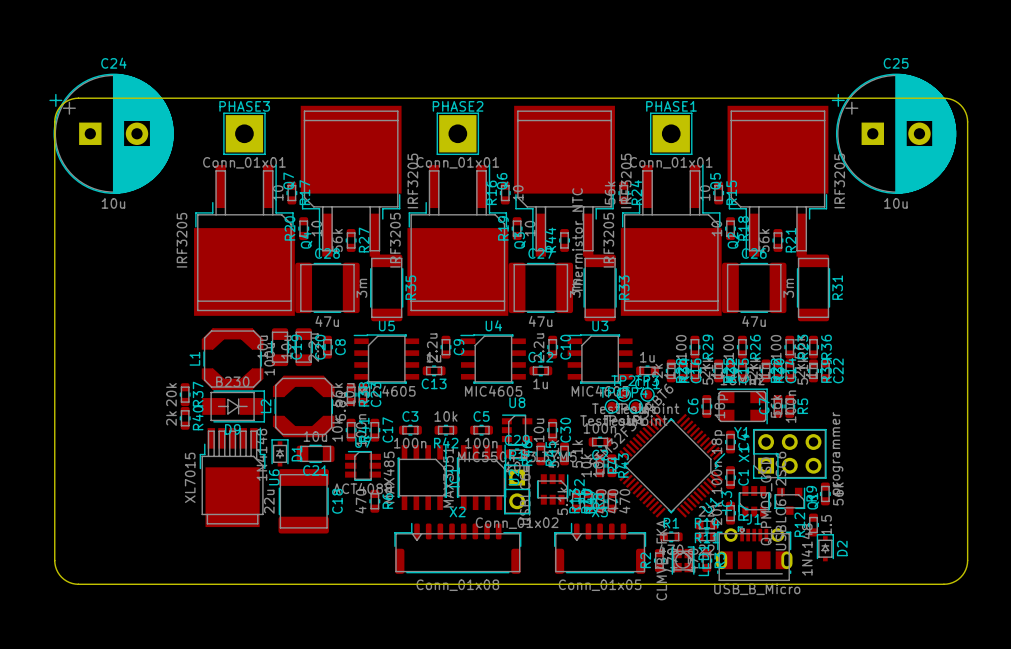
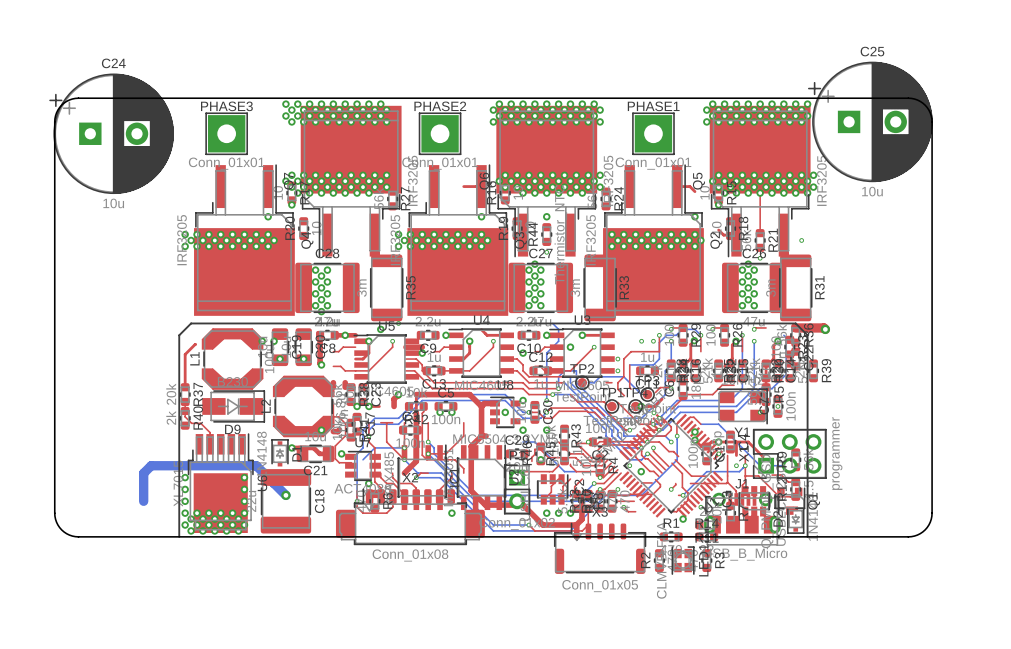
board edge: (908, 98) (952, 100) (962, 107) (967, 118) (967, 560) (962, 575) (952, 582) (943, 584) (75, 584) (64, 579) (55, 566) (54, 513) -> (908, 98) (917, 100) (925, 105) (930, 112) (932, 121) (932, 513) (928, 525) (917, 535) (908, 536) (78, 536) (69, 535) (61, 529) (56, 522) (54, 513)
via: none -> (285, 104)
via: none -> (297, 104)
via: none -> (309, 104)
via: none -> (321, 104)
via: none -> (333, 104)
via: none -> (345, 104)
via: none -> (357, 104)
via: none -> (368, 104)
via: none -> (380, 104)
via: none -> (499, 104)
via: none -> (511, 104)
via: none -> (523, 104)
via: none -> (534, 104)
via: none -> (546, 104)
via: none -> (558, 104)
via: none -> (570, 104)
via: none -> (582, 104)
via: none -> (594, 104)
via: none -> (712, 104)
via: none -> (724, 104)
via: none -> (736, 104)
via: none -> (748, 104)
via: none -> (760, 104)
via: none -> (772, 104)
via: none -> (783, 104)
via: none -> (795, 104)
via: none -> (807, 104)
via: none -> (291, 110)
via: none -> (303, 110)
via: none -> (315, 110)
via: none -> (327, 110)
via: none -> (339, 110)
via: none -> (351, 110)
via: none -> (363, 110)
via: none -> (374, 110)
via: none -> (386, 110)
via: none -> (493, 110)
via: none -> (505, 110)
via: none -> (517, 110)
via: none -> (528, 110)
via: none -> (540, 110)
via: none -> (552, 110)
via: none -> (564, 110)
via: none -> (576, 110)
via: none -> (588, 110)
via: none -> (600, 110)
via: none -> (706, 110)
via: none -> (718, 110)
via: none -> (730, 110)
via: none -> (742, 110)
via: none -> (754, 110)
via: none -> (766, 110)
via: none -> (777, 110)
via: none -> (789, 110)
via: none -> (801, 110)
via: none -> (285, 115)
via: none -> (297, 115)
via: none -> (309, 115)
via: none -> (321, 115)
via: none -> (333, 115)
via: none -> (345, 115)
via: none -> (357, 115)
via: none -> (368, 115)
via: none -> (380, 115)
via: none -> (499, 115)
via: none -> (511, 115)
via: none -> (523, 115)
via: none -> (534, 115)
via: none -> (546, 115)
via: none -> (558, 115)
via: none -> (570, 115)
via: none -> (582, 115)
via: none -> (594, 115)
via: none -> (712, 115)
via: none -> (724, 115)
via: none -> (736, 115)
via: none -> (748, 115)
via: none -> (760, 115)
via: none -> (772, 115)
via: none -> (783, 115)
via: none -> (795, 115)
via: none -> (807, 115)
via: none -> (291, 121)
via: none -> (303, 121)
via: none -> (315, 121)
via: none -> (327, 121)
via: none -> (339, 121)
via: none -> (351, 121)
via: none -> (363, 121)
via: none -> (374, 121)
via: none -> (386, 121)
via: none -> (493, 121)
via: none -> (505, 121)
via: none -> (517, 121)
via: none -> (528, 121)
via: none -> (540, 121)
via: none -> (552, 121)
via: none -> (564, 121)
via: none -> (576, 121)
via: none -> (588, 121)
via: none -> (600, 121)
via: none -> (706, 121)
via: none -> (718, 121)
via: none -> (730, 121)
via: none -> (742, 121)
via: none -> (754, 121)
via: none -> (766, 121)
via: none -> (777, 121)
via: none -> (789, 121)
via: none -> (801, 121)
PHASE3 position: (244, 133) -> (226, 133)
PHASE2 position: (457, 133) -> (440, 133)
PHASE1 position: (671, 133) -> (653, 133)
C25 position: (894, 133) -> (870, 121)
via: none -> (291, 175)
via: none -> (303, 175)
via: none -> (315, 175)
via: none -> (327, 175)
via: none -> (339, 175)
via: none -> (351, 175)
via: none -> (363, 175)
via: none -> (374, 175)
via: none -> (386, 175)
via: none -> (505, 175)
via: none -> (517, 175)
via: none -> (528, 175)
via: none -> (540, 175)
via: none -> (552, 175)
via: none -> (564, 175)
via: none -> (576, 175)
via: none -> (588, 175)
via: none -> (600, 175)
via: none -> (718, 175)
via: none -> (730, 175)
via: none -> (742, 175)
via: none -> (754, 175)
via: none -> (766, 175)
via: none -> (777, 175)
via: none -> (789, 175)
via: none -> (801, 175)
via: none -> (813, 175)
via: none -> (285, 181)
via: none -> (297, 181)
via: none -> (309, 181)
via: none -> (321, 181)
via: none -> (333, 181)
via: none -> (345, 181)
via: none -> (357, 181)
via: none -> (368, 181)
via: none -> (380, 181)
via: none -> (499, 181)
via: none -> (511, 181)
via: none -> (523, 181)
via: none -> (534, 181)
via: none -> (546, 181)
via: none -> (558, 181)
Q6 position: (564, 181) -> (546, 181)
via: none -> (570, 181)
via: none -> (582, 181)
via: none -> (594, 181)
via: none -> (712, 181)
via: none -> (724, 181)
via: none -> (736, 181)
via: none -> (748, 181)
via: none -> (760, 181)
via: none -> (772, 181)
Q5 position: (777, 181) -> (760, 181)
via: none -> (783, 181)
via: none -> (795, 181)
via: none -> (807, 181)
top track: none -> (463, 186) (476, 186) (481, 191)
top track: none -> (677, 186) (689, 186) (694, 191)
via: none -> (291, 187)
via: none -> (303, 187)
via: none -> (315, 187)
via: none -> (327, 187)
via: none -> (339, 187)
via: none -> (351, 187)
via: none -> (363, 187)
via: none -> (374, 187)
via: none -> (386, 187)
via: none -> (505, 187)
via: none -> (517, 187)
via: none -> (528, 187)
via: none -> (540, 187)
via: none -> (552, 187)
via: none -> (564, 187)
via: none -> (576, 187)
via: none -> (588, 187)
via: none -> (600, 187)
via: none -> (718, 187)
via: none -> (730, 187)
via: none -> (742, 187)
via: none -> (754, 187)
via: none -> (766, 187)
via: none -> (777, 187)
via: none -> (789, 187)
via: none -> (801, 187)
via: none -> (813, 187)
via: none -> (297, 193)
via: none -> (309, 193)
via: none -> (321, 193)
via: none -> (333, 193)
via: none -> (345, 193)
via: none -> (357, 193)
via: none -> (368, 193)
via: none -> (523, 193)
via: none -> (534, 193)
via: none -> (546, 193)
via: none -> (558, 193)
via: none -> (570, 193)
via: none -> (582, 193)
R24 position: (623, 193) -> (606, 198)
via: none -> (724, 193)
via: none -> (736, 193)
via: none -> (748, 193)
top track: none -> (760, 193) (760, 233)
via: none -> (760, 193)
via: none -> (772, 193)
via: none -> (783, 193)
via: none -> (795, 193)
via: none -> (807, 193)
via: none -> (291, 204)
via: none -> (718, 204)
via: none -> (268, 216)
via: none -> (481, 216)
via: none -> (546, 216)
via: none -> (694, 216)
top track: none -> (718, 230) (723, 235) (736, 235)
via: none -> (185, 234)
via: none -> (197, 234)
via: none -> (208, 234)
via: none -> (220, 234)
via: none -> (232, 234)
via: none -> (244, 234)
via: none -> (256, 234)
via: none -> (268, 234)
via: none -> (398, 234)
via: none -> (410, 234)
via: none -> (422, 234)
via: none -> (434, 234)
via: none -> (445, 234)
via: none -> (457, 234)
via: none -> (469, 234)
via: none -> (481, 234)
via: none -> (611, 234)
via: none -> (623, 234)
via: none -> (635, 234)
via: none -> (647, 234)
via: none -> (659, 234)
via: none -> (671, 234)
via: none -> (683, 234)
via: none -> (694, 234)
via: none -> (191, 240)
via: none -> (202, 240)
via: none -> (214, 240)
via: none -> (226, 240)
via: none -> (238, 240)
via: none -> (250, 240)
via: none -> (262, 240)
via: none -> (274, 240)
R27 position: (351, 240) -> (392, 198)
via: none -> (404, 240)
via: none -> (416, 240)
via: none -> (428, 240)
via: none -> (440, 240)
via: none -> (451, 240)
via: none -> (463, 240)
via: none -> (475, 240)
via: none -> (487, 240)
R44 position: (564, 240) -> (546, 234)
via: none -> (617, 240)
via: none -> (629, 240)
via: none -> (641, 240)
via: none -> (653, 240)
via: none -> (665, 240)
Q2 position: (671, 240) -> (653, 240)
via: none -> (677, 240)
via: none -> (689, 240)
via: none -> (700, 240)
R21 position: (777, 240) -> (760, 240)
via: none -> (801, 240)
via: none -> (185, 246)
via: none -> (197, 246)
via: none -> (208, 246)
via: none -> (220, 246)
via: none -> (232, 246)
via: none -> (244, 246)
via: none -> (256, 246)
via: none -> (268, 246)
via: none -> (398, 246)
via: none -> (410, 246)
via: none -> (422, 246)
via: none -> (434, 246)
via: none -> (445, 246)
via: none -> (457, 246)
via: none -> (469, 246)
via: none -> (481, 246)
via: none -> (611, 246)
via: none -> (623, 246)
via: none -> (635, 246)
via: none -> (647, 246)
via: none -> (659, 246)
via: none -> (671, 246)
via: none -> (683, 246)
via: none -> (694, 246)
via: none -> (546, 252)
via: none -> (760, 258)
via: none -> (534, 264)
via: none -> (748, 264)
via: none -> (315, 270)
via: none -> (327, 270)
via: none -> (528, 270)
via: none -> (540, 270)
via: none -> (742, 270)
via: none -> (754, 270)
via: none -> (321, 276)
via: none -> (534, 276)
via: none -> (748, 276)
via: none -> (315, 281)
via: none -> (327, 281)
via: none -> (528, 281)
via: none -> (540, 281)
via: none -> (742, 281)
via: none -> (754, 281)
via: none -> (321, 287)
via: none -> (534, 287)
via: none -> (748, 287)
R31 position: (813, 287) -> (795, 287)
via: none -> (315, 293)
via: none -> (327, 293)
via: none -> (528, 293)
via: none -> (540, 293)
via: none -> (742, 293)
via: none -> (754, 293)
via: none -> (321, 299)
via: none -> (534, 299)
via: none -> (748, 299)
via: none -> (315, 305)
via: none -> (327, 305)
via: none -> (528, 305)
via: none -> (540, 305)
via: none -> (742, 305)
via: none -> (754, 305)
via: none -> (321, 311)
via: none -> (398, 323)
bottom track: none -> (552, 323) (558, 329) (558, 341) (546, 353) (546, 400)
top track: none -> (683, 327) (671, 329)
top track: none -> (724, 327) (712, 329)
top track: none -> (766, 327) (754, 329)
top track: none -> (795, 327) (825, 329)
via: none -> (380, 329)
top track: none -> (481, 329) (487, 335) (506, 335)
via: none -> (671, 329)
via: none -> (712, 329)
via: none -> (754, 329)
via: none -> (825, 329)
top track: none -> (320, 335) (321, 364)
top track: none -> (334, 335) (355, 335)
via: none -> (345, 335)
via: none -> (445, 335)
via: none -> (546, 335)
top track: none -> (582, 335) (607, 335)
via: none -> (582, 335)
top track: none -> (659, 335) (659, 351) (631, 351) (623, 359) (623, 376) (617, 382) (617, 389) (624, 395)
via: none -> (659, 335)
bottom track: none -> (700, 335) (694, 329) (682, 329) (676, 335) (666, 335) (659, 342) (659, 359) (653, 364) (629, 364)
top track: none -> (700, 335) (700, 351)
via: none -> (700, 335)
bottom track: none -> (742, 335) (742, 388) (730, 400) (677, 400) (659, 418)
top track: none -> (742, 335) (742, 351)
via: none -> (742, 335)
bottom track: none -> (783, 335) (786, 337) (786, 374) (772, 388) (760, 388) (736, 412) (680, 412) (662, 430) (659, 430)
top track: none -> (694, 340) (690, 344) (690, 358) (683, 366)
via: none -> (694, 340)
via: none -> (262, 341)
via: none -> (274, 341)
top track: none -> (368, 341) (368, 353) (363, 359) (355, 359)
via: none -> (368, 341)
top track: none -> (392, 341) (392, 347) (368, 370) (345, 370) (340, 366) (333, 366)
via: none -> (392, 341)
top track: none -> (469, 341) (469, 353) (463, 359) (456, 359)
via: none -> (469, 341)
top track: none -> (493, 341) (493, 347) (469, 370) (444, 370) (439, 366) (434, 366)
via: none -> (493, 341)
via: none -> (641, 341)
via: none -> (653, 341)
bottom track: none -> (671, 341) (671, 364) (665, 370) (665, 394) (641, 418) (623, 418)
via: none -> (671, 341)
top track: none -> (736, 341) (732, 345) (732, 358) (724, 366)
via: none -> (736, 341)
bottom track: none -> (754, 341) (754, 388) (736, 406) (678, 406) (660, 424) (653, 424)
via: none -> (754, 341)
top track: none -> (777, 341) (773, 345) (773, 358) (766, 366) (766, 387)
via: none -> (777, 341)
top track: none -> (195, 344) (185, 354) (185, 387)
C8 rotation: 0° (327, 347) -> 90° clockwise (327, 335)
top track: none -> (355, 347) (343, 347) (338, 351) (333, 351)
top track: none -> (405, 347) (422, 347)
C9 rotation: 0° (445, 347) -> 90° clockwise (428, 335)
C9 position: (445, 347) -> (428, 335)
top track: none -> (456, 347) (444, 347) (439, 351) (434, 351)
C10 rotation: 0° (552, 347) -> 90° clockwise (528, 335)
C10 position: (552, 347) -> (528, 335)
top track: none -> (557, 347) (544, 347) (540, 351) (534, 351)
via: none -> (570, 347)
top track: none -> (594, 347) (570, 370) (544, 370) (540, 366) (534, 366)
via: none -> (594, 347)
R29 position: (694, 347) -> (683, 335)
R26 position: (742, 347) -> (724, 335)
R36 position: (813, 347) -> (795, 335)
via: none -> (422, 353)
via: none -> (523, 353)
via: none -> (280, 359)
via: none -> (303, 359)
top track: none -> (405, 359) (416, 359) (422, 364) (422, 370) (434, 382) (523, 382) (528, 388) (558, 388)
U4 position: (493, 359) -> (481, 353)
top track: none -> (506, 359) (517, 359) (523, 364) (523, 370) (528, 376) (570, 376)
U3 position: (599, 359) -> (581, 353)
via: none -> (617, 359)
via: none -> (321, 364)
top track: none -> (629, 364) (631, 389)
top track: none -> (405, 370) (414, 370) (432, 388) (523, 388) (528, 394) (552, 394)
top track: none -> (506, 370) (517, 370) (528, 382) (564, 382)
via: none -> (617, 370)
C22 position: (825, 370) -> (795, 359)
bottom track: none -> (570, 376) (570, 382) (617, 430) (617, 436) (623, 442) (647, 442)
top track: none -> (333, 382) (333, 387)
top track: none -> (345, 382) (345, 387)
bottom track: none -> (564, 382) (611, 430) (611, 436) (623, 447) (641, 447)
bottom track: none -> (588, 382) (594, 382) (600, 376) (623, 376) (641, 394)
top track: none -> (606, 382) (611, 382)
top track: none -> (734, 385) (722, 385) (712, 394) (684, 394) (671, 409)
bottom track: none -> (558, 388) (558, 376) (564, 370) (576, 370) (576, 382) (623, 430) (623, 436) (665, 436) (671, 442)
via: none -> (558, 388)
top track: none -> (671, 388) (660, 387) (655, 392)
via: none -> (671, 388)
via: none -> (398, 394)
bottom track: none -> (552, 394) (570, 394) (606, 430) (606, 436) (629, 459) (641, 459) (647, 453)
via: none -> (552, 394)
top track: none -> (570, 394) (577, 401) (604, 401) (611, 409)
TP2 position: (623, 394) -> (582, 382)
top track: none -> (398, 396) (394, 399) (394, 406)
top track: none -> (662, 399) (654, 406) (641, 406)
via: none -> (523, 400)
via: none -> (546, 400)
top track: none -> (185, 401) (185, 416) (191, 423) (200, 423) (210, 432) (210, 444)
top track: none -> (333, 401) (333, 416) (338, 416) (345, 423) (345, 435) (335, 445) (335, 458) (339, 462) (351, 462)
top track: none -> (617, 402) (639, 424) (653, 424)
top track: none -> (495, 403) (484, 403) (481, 406) (481, 436)
via: none -> (357, 406)
top track: none -> (368, 406) (379, 406)
via: none -> (368, 406)
top track: none -> (423, 406) (422, 455) (426, 459) (454, 459) (463, 468) (463, 473)
top track: none -> (481, 406) (469, 394) (416, 394) (416, 461) (404, 473)
via: none -> (641, 406)
C6 position: (706, 406) -> (683, 388)
via: none -> (777, 406)
R5 position: (789, 406) -> (766, 394)
via: none -> (440, 412)
via: none -> (451, 412)
via: none -> (505, 412)
bottom track: none -> (528, 412) (523, 412) (505, 394) (422, 394) (398, 418) (374, 418) (363, 430) (363, 447) (357, 453) (357, 501)
top track: none -> (528, 412) (538, 412) (544, 418) (552, 418) (559, 411) (587, 411) (594, 412) (601, 418)
via: none -> (528, 412)
bottom track: none -> (546, 412) (540, 418) (523, 418) (505, 400) (422, 400) (398, 424) (374, 424) (368, 430) (368, 436)
top track: none -> (546, 412) (551, 408) (597, 408) (604, 415)
via: none -> (546, 412)
top track: none -> (607, 412) (625, 430) (629, 430)
via: none -> (653, 412)
via: none -> (760, 412)
top track: none -> (659, 418) (662, 418) (671, 426) (671, 430) (665, 436) (646, 436) (637, 445) (602, 445) (598, 449)
via: none -> (659, 418)
top track: none -> (681, 418) (676, 423) (677, 436)
top track: none -> (368, 422) (368, 442) (374, 447) (374, 481) (381, 488) (381, 496)
top track: none -> (380, 422) (392, 422)
top track: none -> (386, 422) (386, 442) (404, 459)
top track: none -> (404, 422) (404, 447)
top track: none -> (428, 422) (428, 442)
top track: none -> (463, 422) (463, 436) (445, 453) (428, 453)
top track: none -> (685, 422) (690, 417) (693, 417) (700, 424)
via: none -> (653, 424)
bottom track: none -> (700, 424) (718, 424) (760, 465) (783, 465)
via: none -> (321, 430)
top track: none -> (339, 430) (333, 431)
C17 position: (374, 430) -> (357, 424)
R42 position: (445, 430) -> (416, 406)
C5 position: (481, 430) -> (445, 406)
U8 position: (517, 430) -> (505, 412)
via: none -> (523, 430)
via: none -> (546, 430)
C30 position: (552, 430) -> (534, 412)
via: none -> (629, 430)
top track: none -> (659, 430) (647, 430) (635, 441) (599, 441) (594, 446)
via: none -> (659, 430)
via: none -> (694, 432)
via: none -> (368, 436)
top track: none -> (481, 436) (486, 436)
top track: none -> (481, 436) (471, 446) (471, 490) (485, 505) (523, 505) (542, 525) (576, 525) (581, 519) (581, 496)
bottom track: none -> (677, 436) (677, 459) (641, 495) (606, 495) (570, 530) (493, 530) (440, 477) (416, 477)
via: none -> (677, 436)
via: none -> (694, 440)
top track: none -> (695, 440) (701, 446) (706, 446) (711, 442) (748, 442) (763, 456)
bottom track: none -> (428, 442) (434, 447) (434, 453) (475, 495) (582, 495) (594, 483)
via: none -> (428, 442)
bottom track: none -> (523, 442) (534, 442) (564, 471) (576, 471)
top track: none -> (558, 442) (564, 443) (564, 447) (570, 453) (582, 453) (590, 461) (599, 461) (604, 456)
top track: none -> (588, 442) (576, 443) (591, 458) (596, 458) (601, 453)
via: none -> (588, 442)
top track: none -> (647, 442) (659, 442) (668, 451) (673, 451) (678, 456)
via: none -> (647, 442)
via: none -> (671, 442)
via: none -> (718, 442)
top track: none -> (736, 442) (736, 455)
top track: none -> (291, 447) (313, 447) (319, 453) (327, 453)
via: none -> (291, 447)
bottom track: none -> (404, 447) (374, 447) (363, 459)
via: none -> (404, 447)
top track: none -> (641, 447) (641, 455) (662, 473)
via: none -> (641, 447)
top track: none -> (653, 447) (653, 451) (668, 466)
via: none -> (653, 447)
via: none -> (341, 453)
bottom track: none -> (428, 453) (475, 501) (588, 501) (600, 489)
via: none -> (428, 453)
top track: none -> (635, 453) (635, 457) (649, 471) (653, 471) (658, 476)
top track: none -> (647, 453) (665, 469)
via: none -> (647, 453)
via: none -> (718, 453)
top track: none -> (727, 455) (727, 482)
top track: none -> (745, 455) (745, 482) (742, 485) (742, 499)
bottom track: none -> (404, 459) (417, 473) (441, 473) (493, 525) (528, 525)
via: none -> (404, 459)
via: none -> (540, 459)
top track: none -> (607, 459) (602, 465) (583, 465) (575, 457) (548, 457) (540, 449) (534, 449) (531, 461)
top track: none -> (675, 459) (691, 476) (706, 476)
top track: none -> (611, 463) (602, 471) (576, 471) (570, 464)
top track: none -> (671, 463) (682, 473) (682, 487) (688, 493) (688, 500) (676, 511) (671, 511)
top track: none -> (558, 464) (552, 471) (518, 471) (514, 475) (514, 481)
R43 position: (611, 465) -> (564, 436)
via: none -> (629, 465)
via: none -> (736, 465)
bottom track: none -> (745, 465) (739, 471) (706, 471) (683, 495)
via: none -> (745, 465)
top track: none -> (614, 466) (603, 477) (600, 477)
top track: none -> (617, 469) (604, 483) (594, 483)
via: none -> (641, 471)
top track: none -> (380, 473) (380, 477) (386, 483) (393, 483) (404, 496)
top track: none -> (392, 473) (392, 477) (398, 483) (411, 483) (416, 488) (416, 496)
top track: none -> (428, 473) (420, 473) (416, 477)
top track: none -> (451, 473) (451, 477) (439, 489) (439, 496)
top track: none -> (621, 473) (604, 489) (600, 489)
top track: none -> (772, 475) (781, 475) (788, 482) (795, 482)
top track: none -> (745, 476) (758, 476) (779, 496) (795, 496)
via: none -> (185, 477)
U6 position: (232, 477) -> (220, 483)
via: none -> (244, 477)
via: none -> (416, 477)
via: none -> (600, 477)
C1 position: (730, 477) -> (706, 453)
top track: none -> (558, 479) (551, 486) (551, 492) (546, 496)
top track: none -> (570, 479) (563, 486) (563, 492) (558, 496)
top track: none -> (582, 479) (574, 486) (574, 492) (570, 496)
top track: none -> (655, 479) (660, 486) (652, 494)
top track: none -> (652, 482) (641, 483)
top track: none -> (727, 482) (736, 491) (736, 499)
top track: none -> (727, 482) (690, 483)
via: none -> (368, 483)
via: none -> (594, 483)
top track: none -> (675, 483) (671, 489)
via: none -> (185, 489)
via: none -> (244, 489)
via: none -> (600, 489)
via: none -> (617, 489)
via: none -> (671, 489)
top track: none -> (357, 490) (357, 507) (363, 513) (386, 513) (392, 506) (392, 496)
R9 position: (825, 493) -> (795, 459)
top track: none -> (652, 494) (601, 495) (588, 508) (588, 525) (582, 530) (534, 530) (528, 525)
bottom track: none -> (285, 495) (256, 465) (151, 465) (143, 473) (143, 501)
via: none -> (285, 495)
top track: none -> (678, 495) (683, 495)
via: none -> (683, 495)
via: none -> (185, 501)
via: none -> (244, 501)
C18 position: (303, 501) -> (285, 501)
via: none -> (357, 501)
top track: none -> (617, 501) (634, 501)
top track: none -> (623, 507) (628, 511) (635, 511)
via: none -> (623, 507)
via: none -> (700, 507)
via: none -> (185, 513)
via: none -> (197, 513)
via: none -> (208, 513)
via: none -> (220, 513)
via: none -> (232, 513)
via: none -> (244, 513)
via: none -> (451, 513)
via: none -> (546, 513)
via: none -> (558, 513)
via: none -> (570, 513)
via: none -> (191, 519)
via: none -> (202, 519)
via: none -> (214, 519)
via: none -> (226, 519)
via: none -> (238, 519)
via: none -> (683, 519)
X2 footprint: [394, 522, 522, 574] -> [335, 488, 485, 545]
via: none -> (185, 525)
via: none -> (197, 525)
via: none -> (208, 525)
via: none -> (220, 525)
via: none -> (232, 525)
via: none -> (244, 525)
via: none -> (528, 525)
R12 position: (813, 525) -> (795, 489)
via: none -> (191, 530)
via: none -> (202, 530)
via: none -> (214, 530)
via: none -> (226, 530)
via: none -> (238, 530)
line: none -> (179, 536) (179, 335) (191, 323) (795, 323) (807, 335) (807, 536)
D2 rotation: 0° (825, 547) -> 180° (795, 520)
D2 position: (825, 547) -> (795, 520)
J1 position: (754, 553) -> (742, 518)

